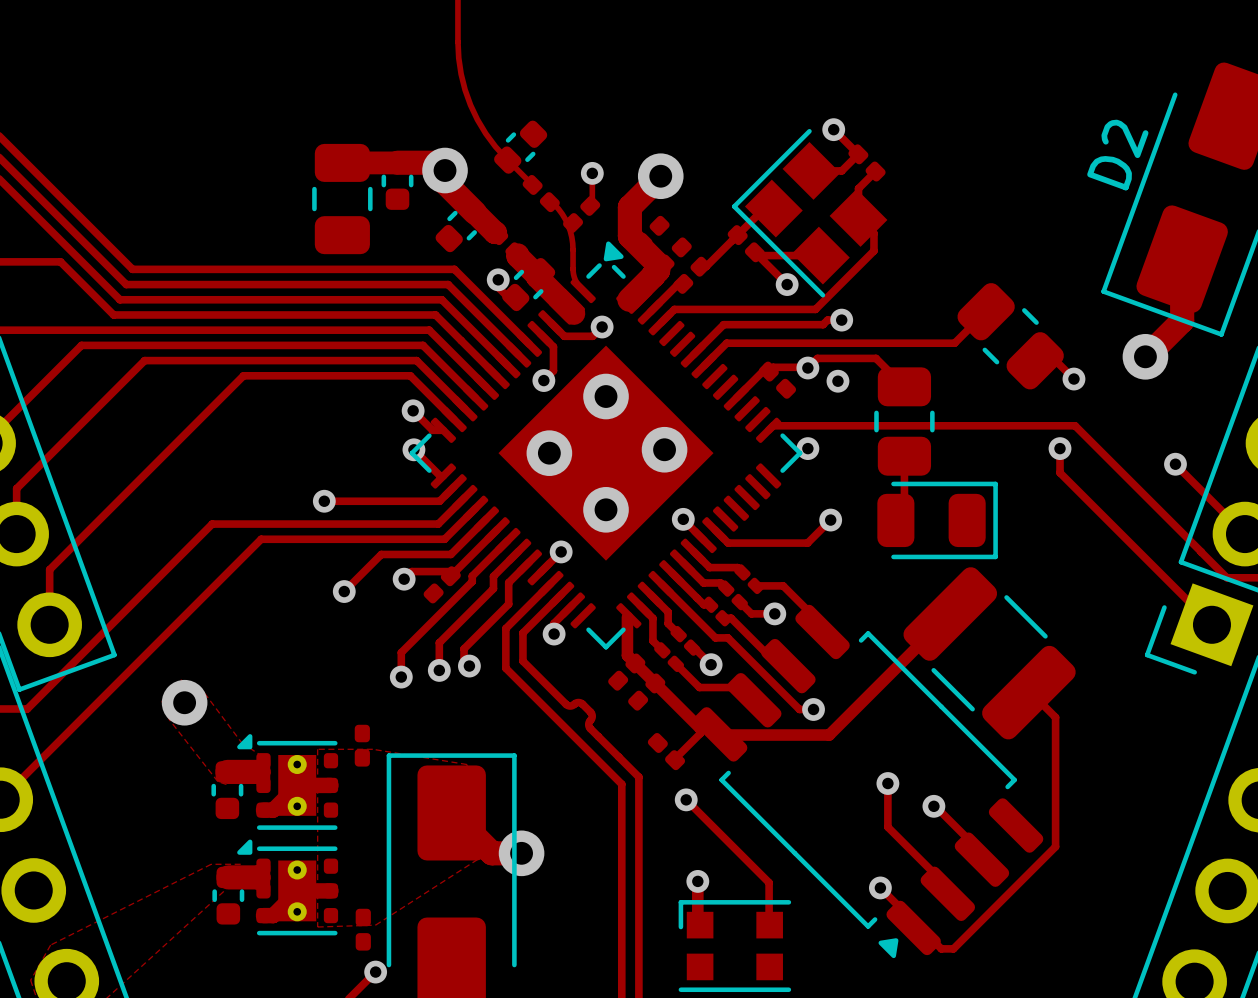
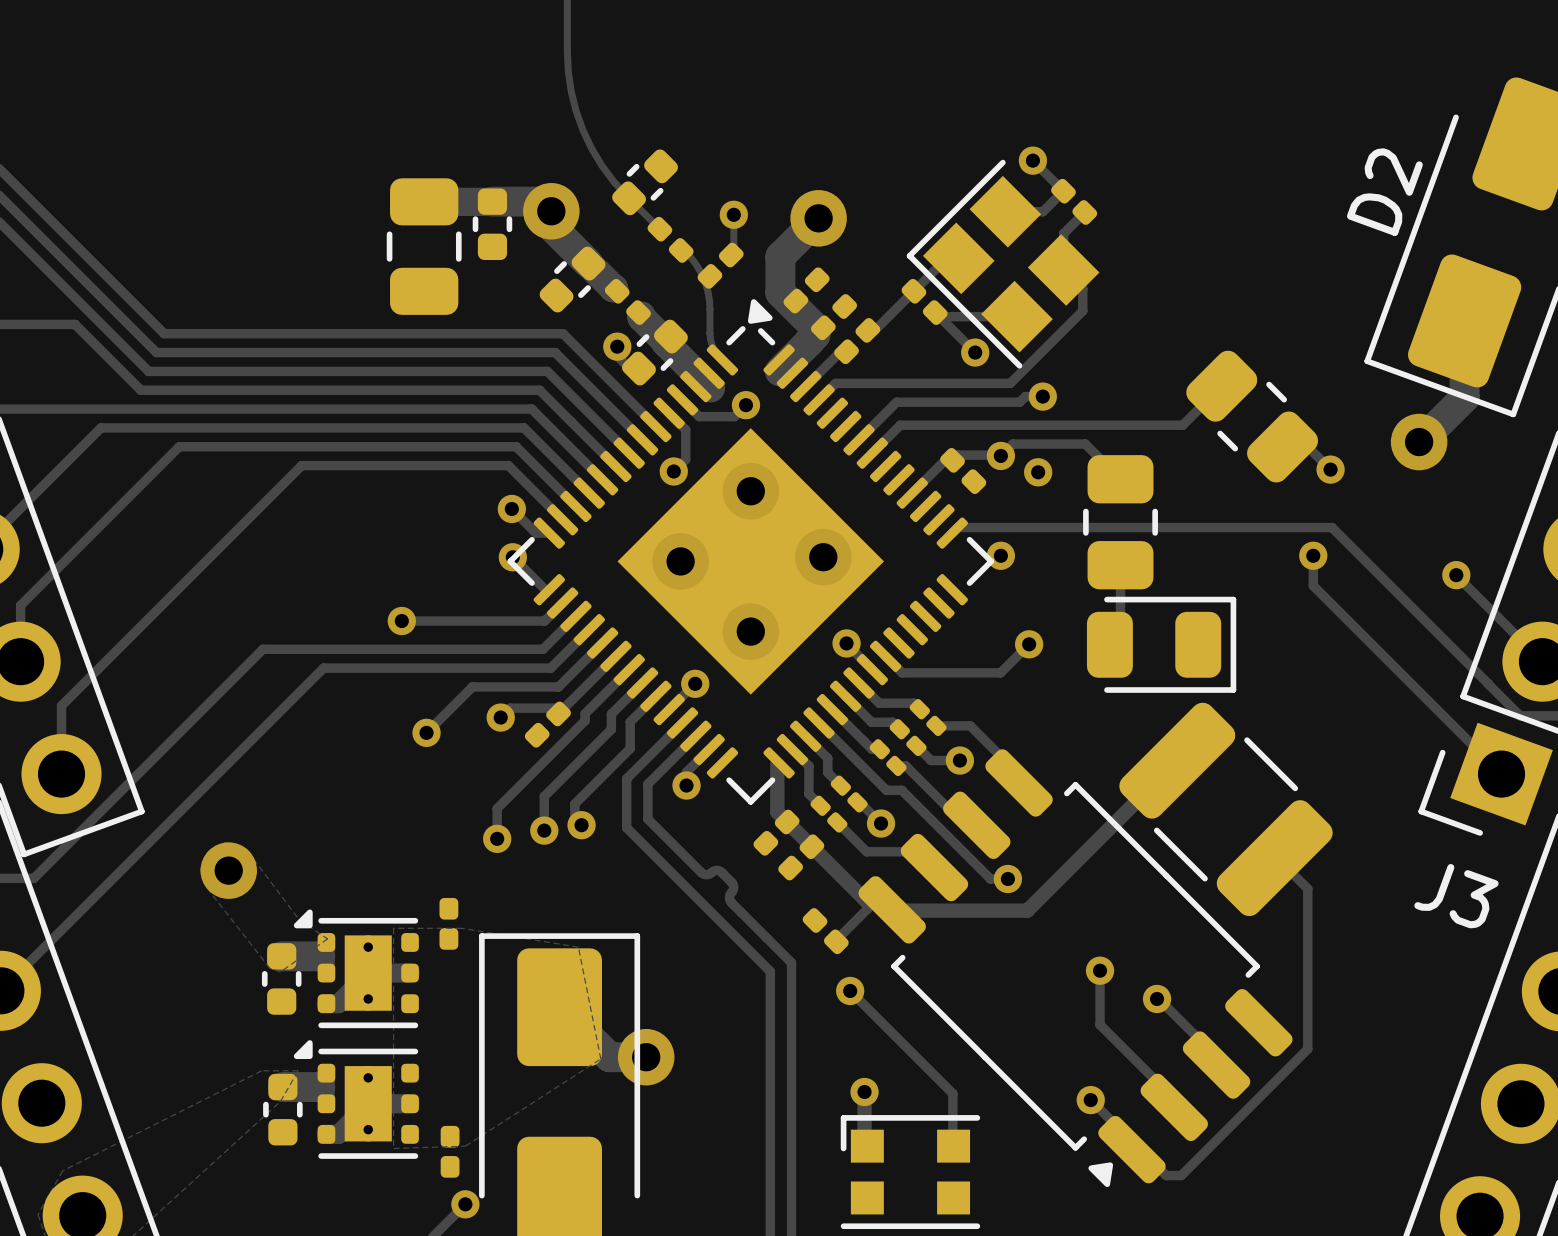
J3 name: none -> J3 (1456, 896)

